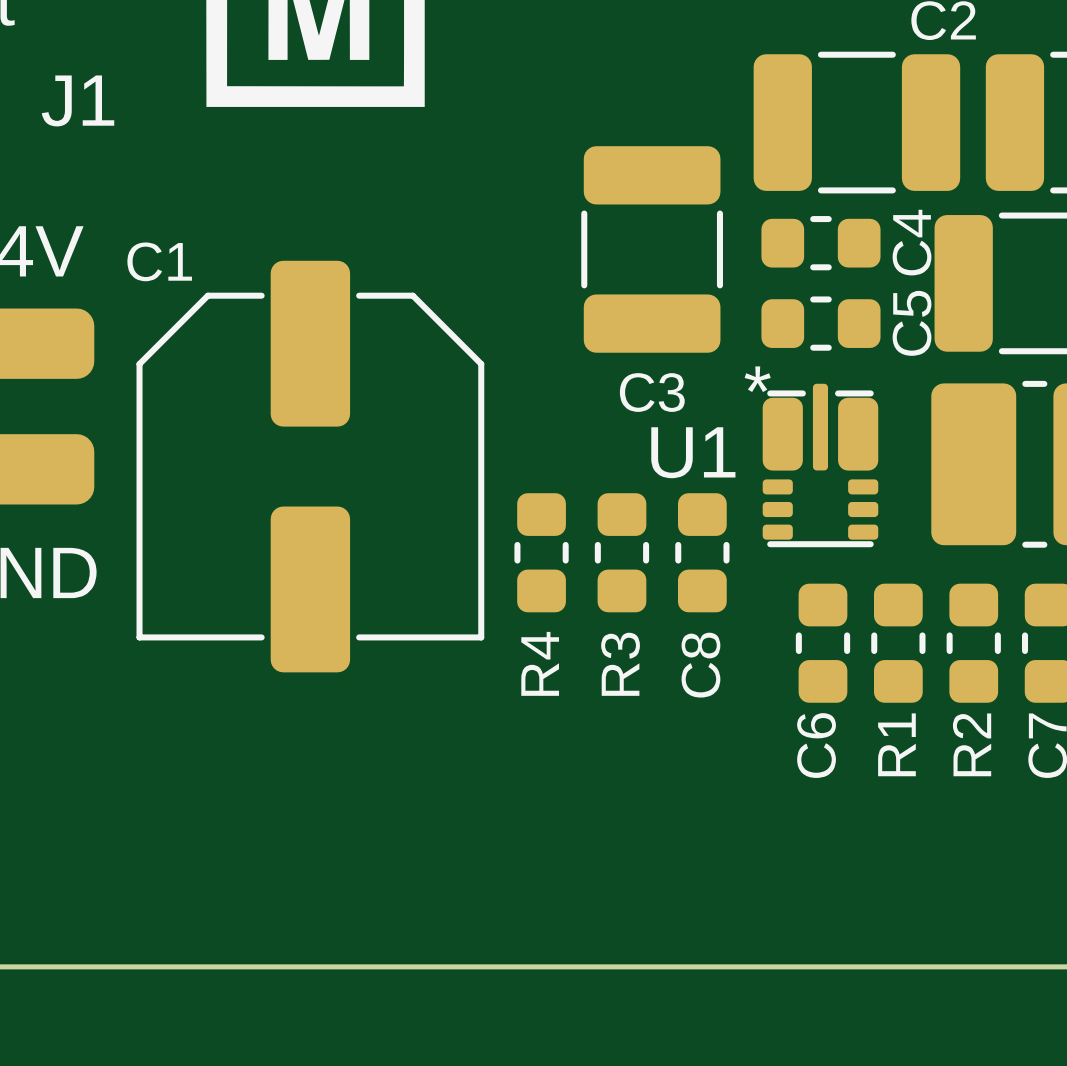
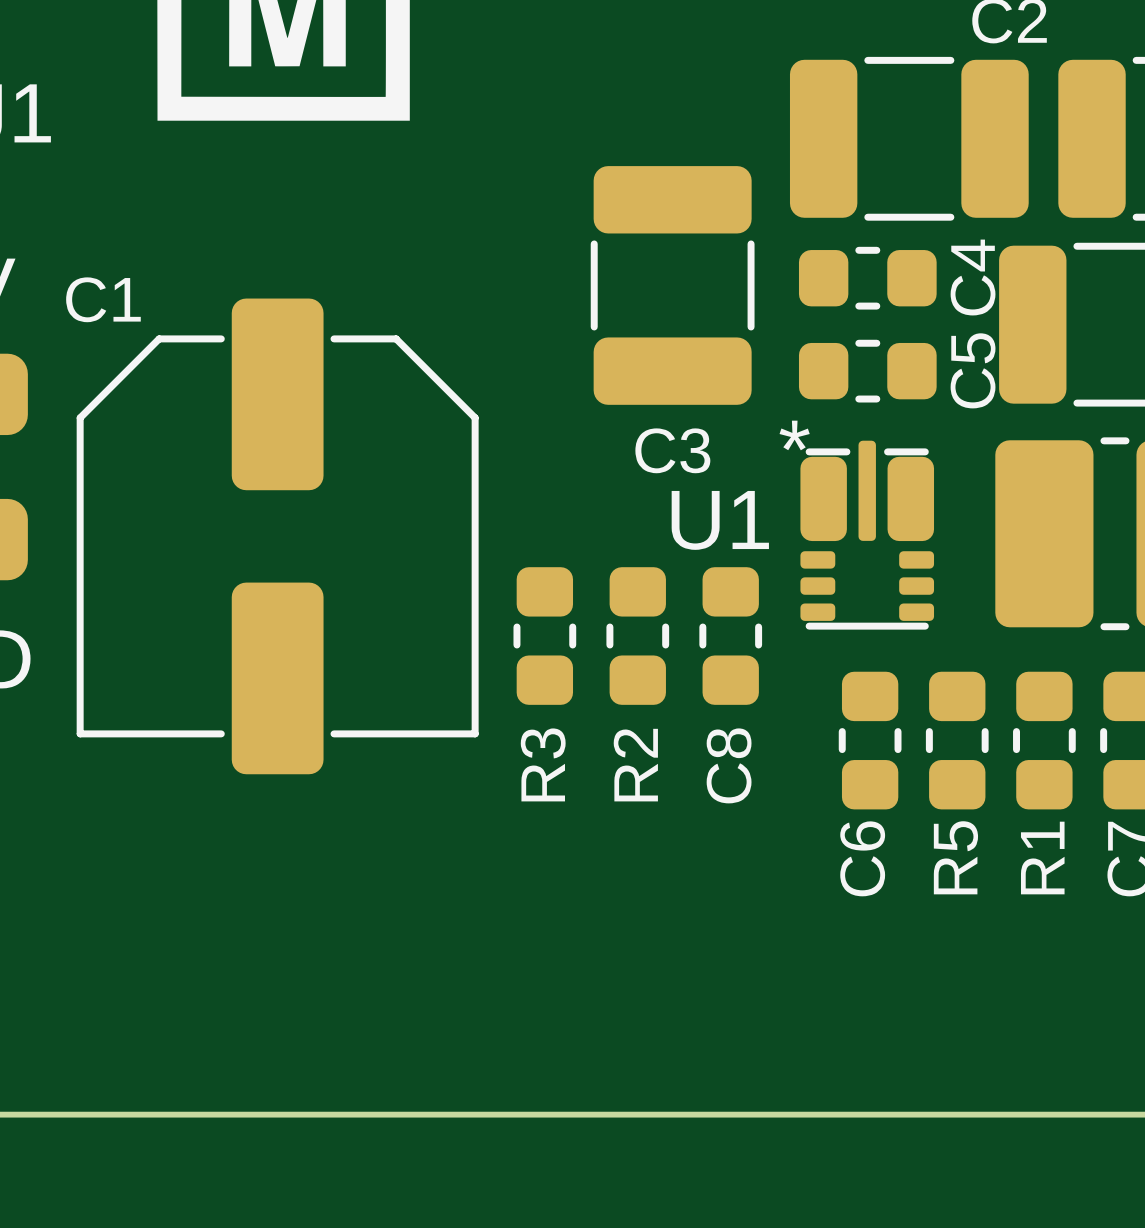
R4 name: R4 (540, 663) -> R3 (543, 764)
R3 name: R3 (620, 664) -> R2 (635, 765)
R1 name: R1 (896, 744) -> R5 (955, 857)
R2 name: R2 (972, 744) -> R1 (1042, 858)

